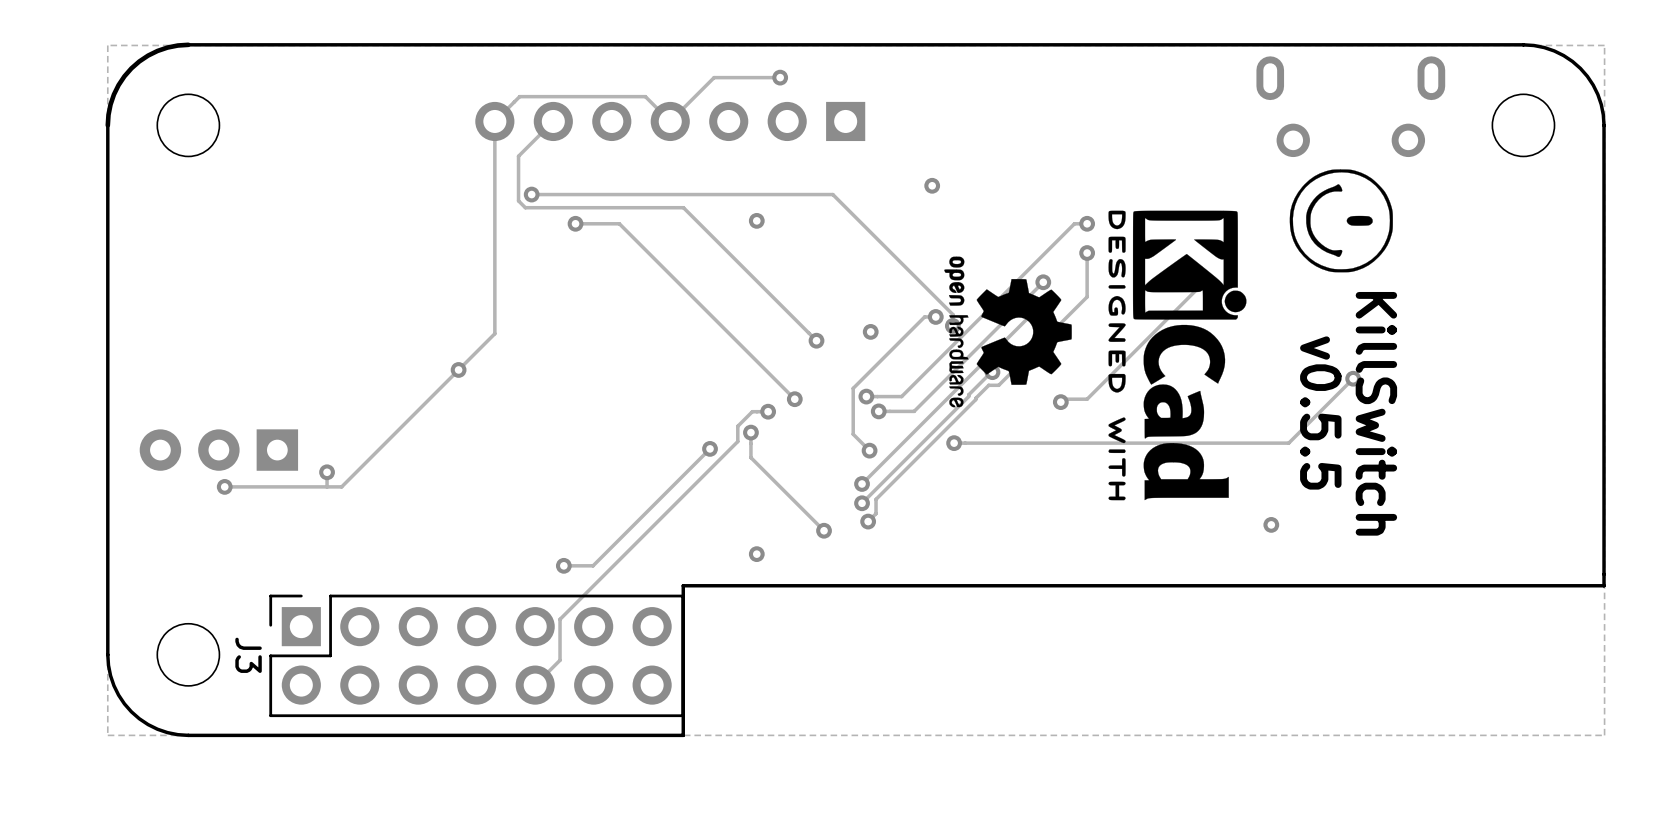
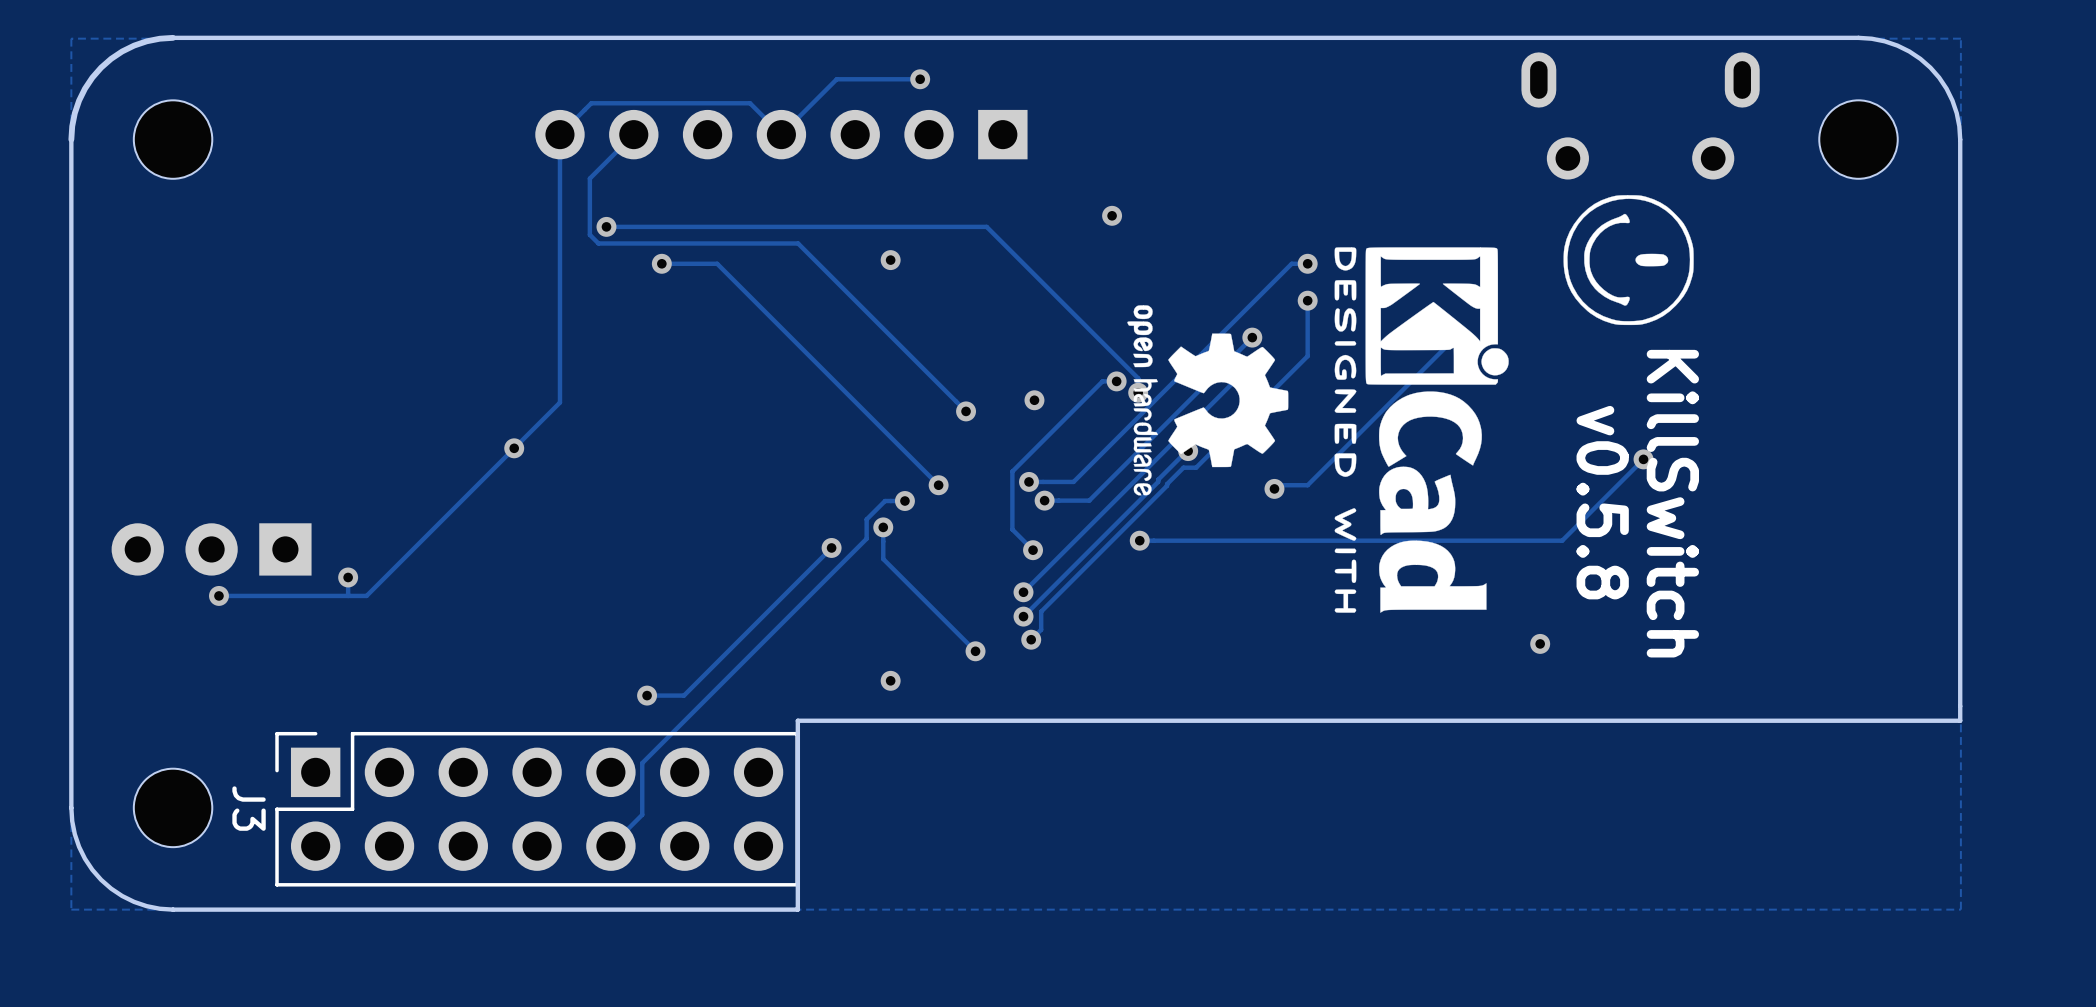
text: v0.5.5 (1320, 412) -> v0.5.8 (1602, 502)

